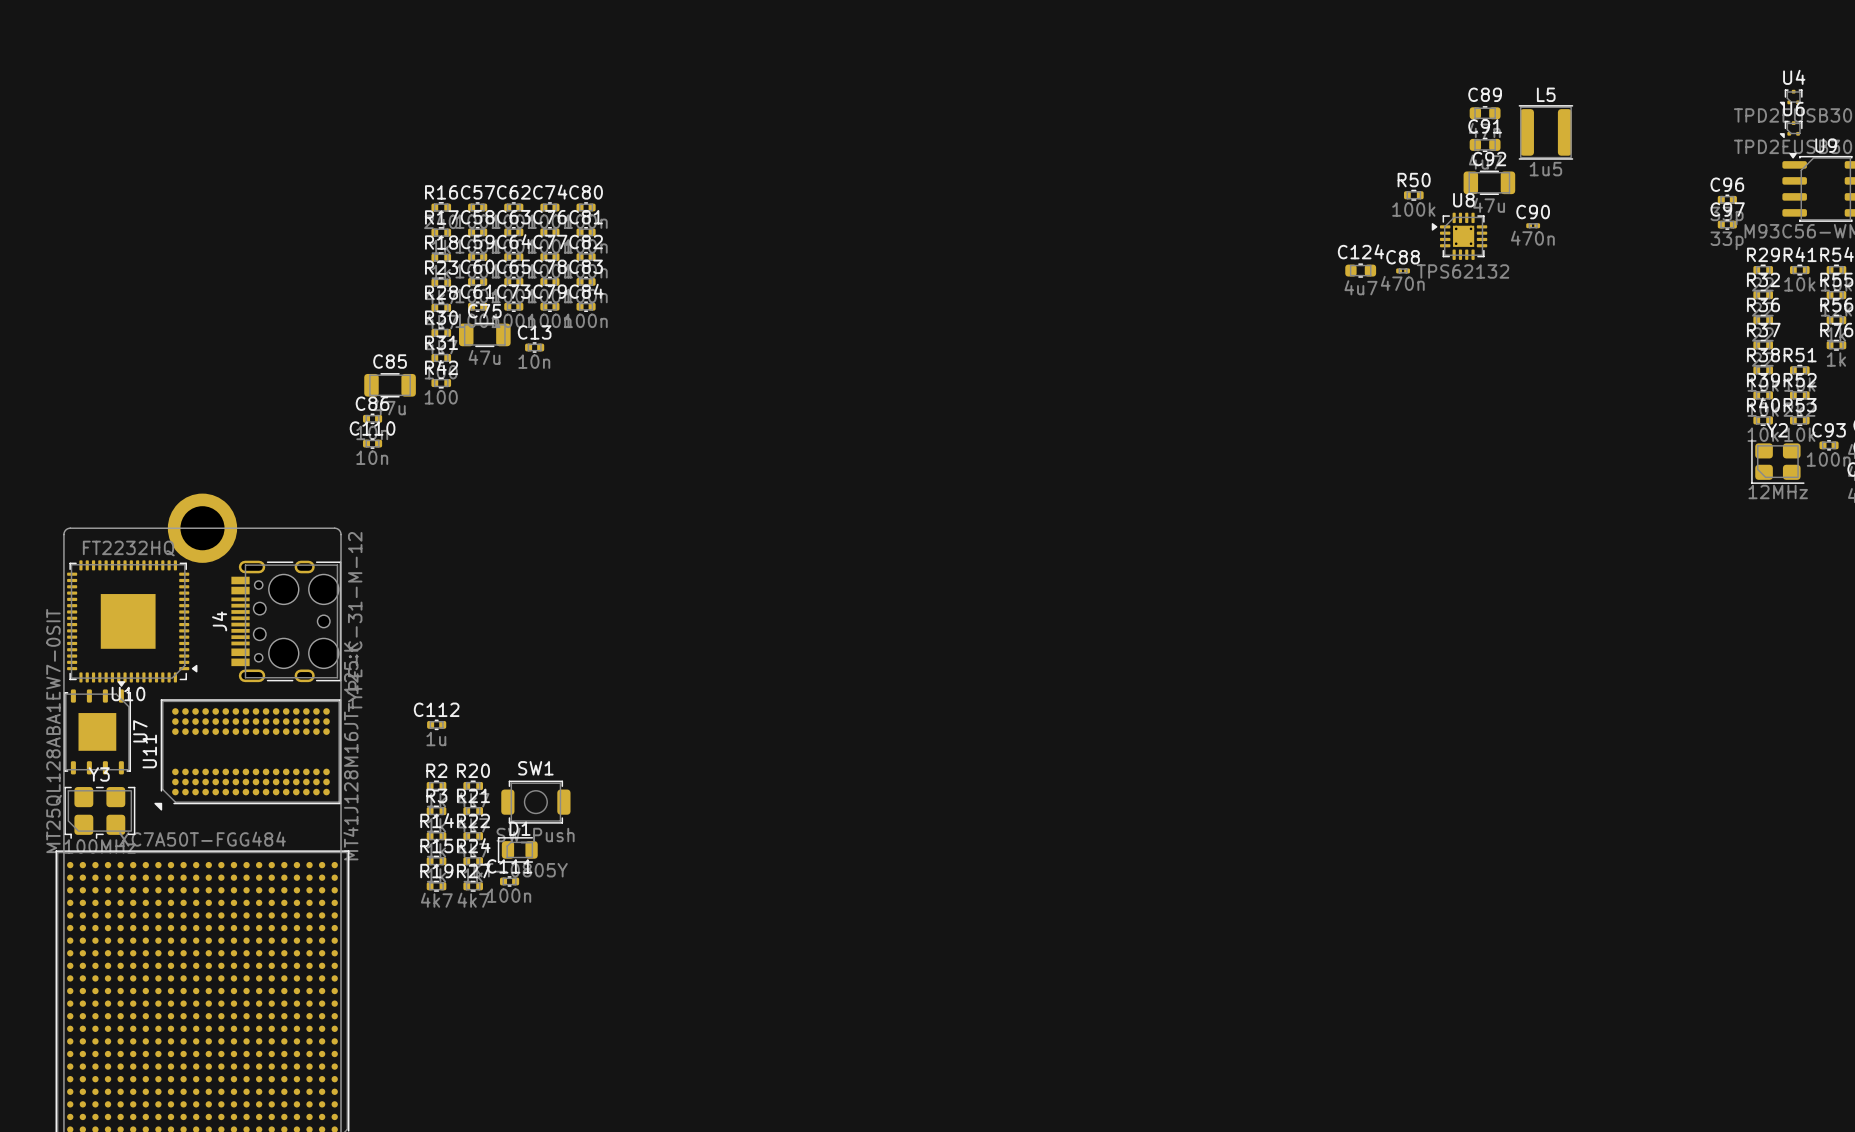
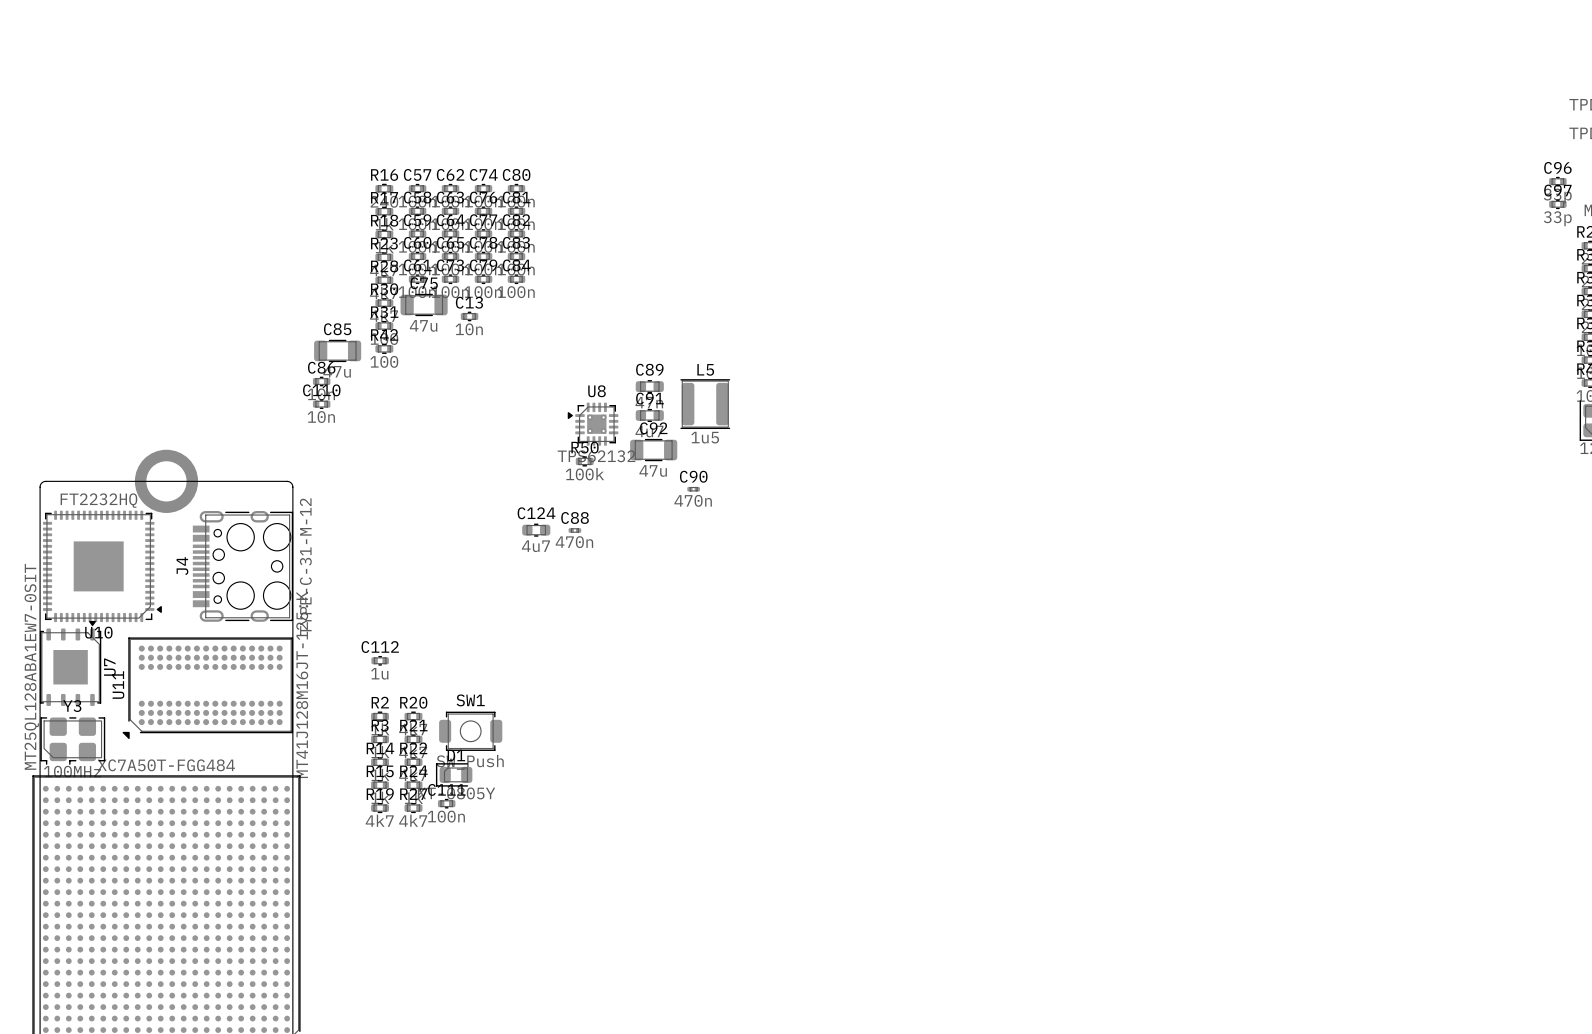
C89 position: (1485, 113) -> (649, 386)
L5 position: (1545, 132) -> (705, 404)
C91 position: (1485, 144) -> (649, 415)
C92 position: (1489, 182) -> (653, 450)
R50 position: (1413, 195) -> (584, 461)
C90 position: (1533, 225) -> (693, 489)
U8 position: (1459, 236) -> (593, 424)
C124 position: (1360, 270) -> (536, 530)
C88 position: (1403, 270) -> (574, 530)

